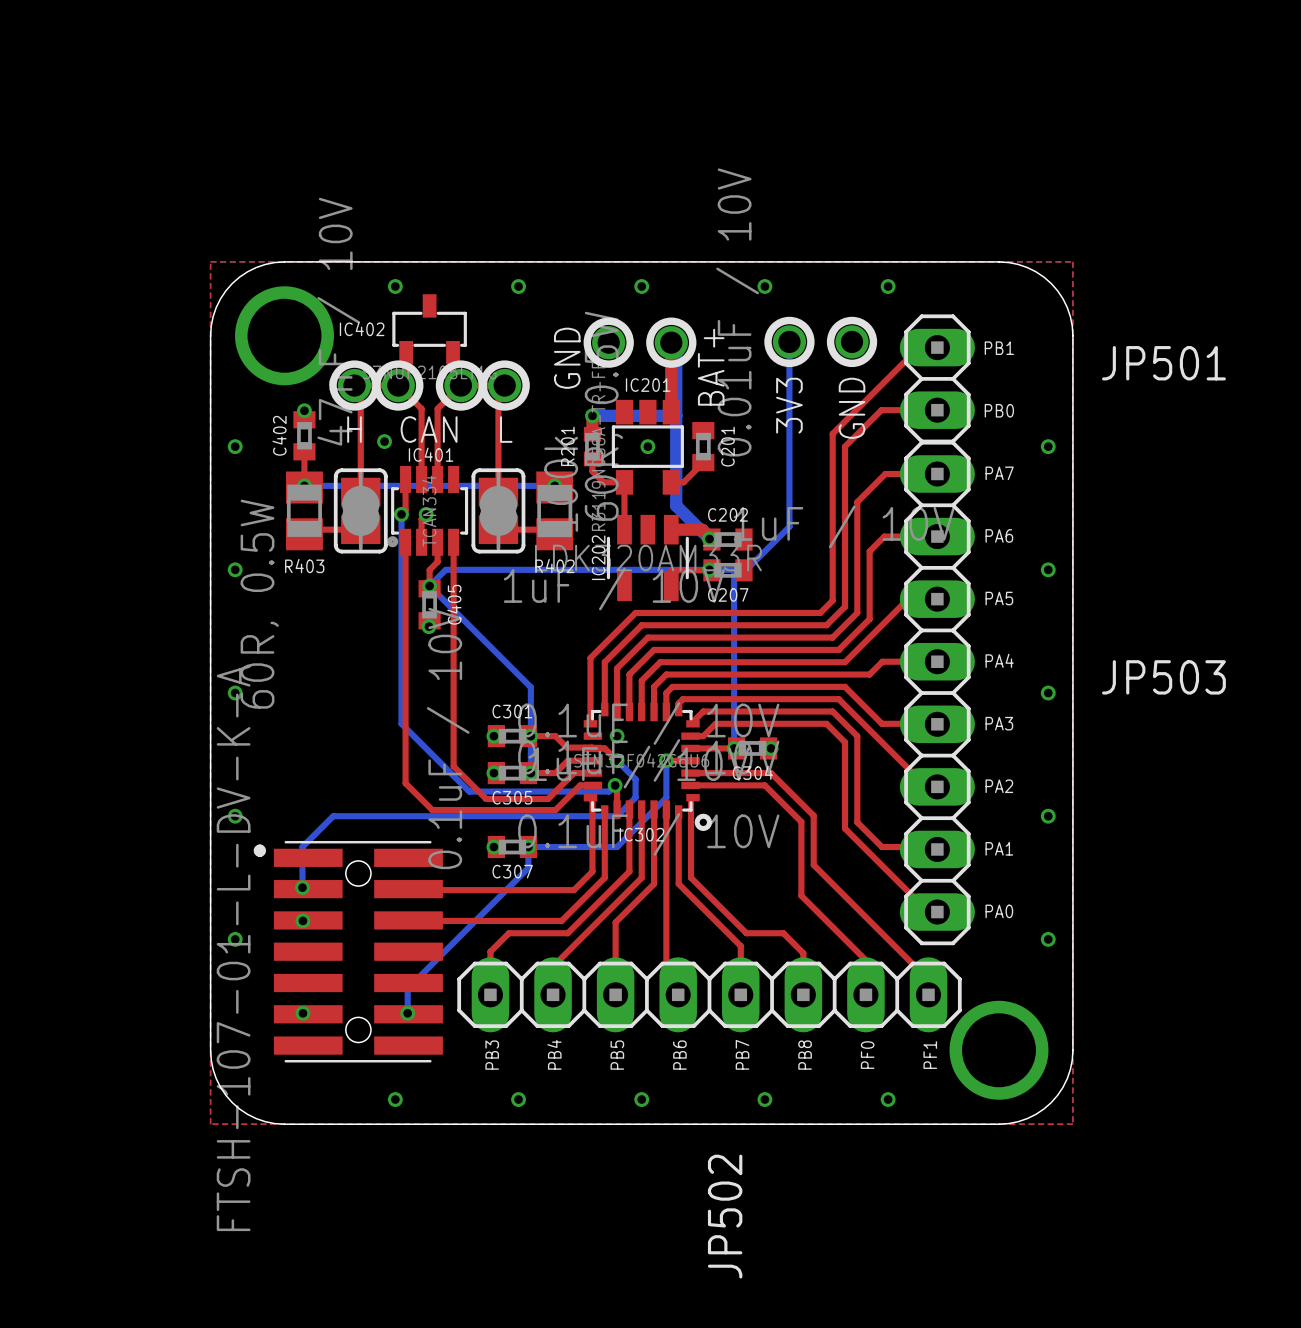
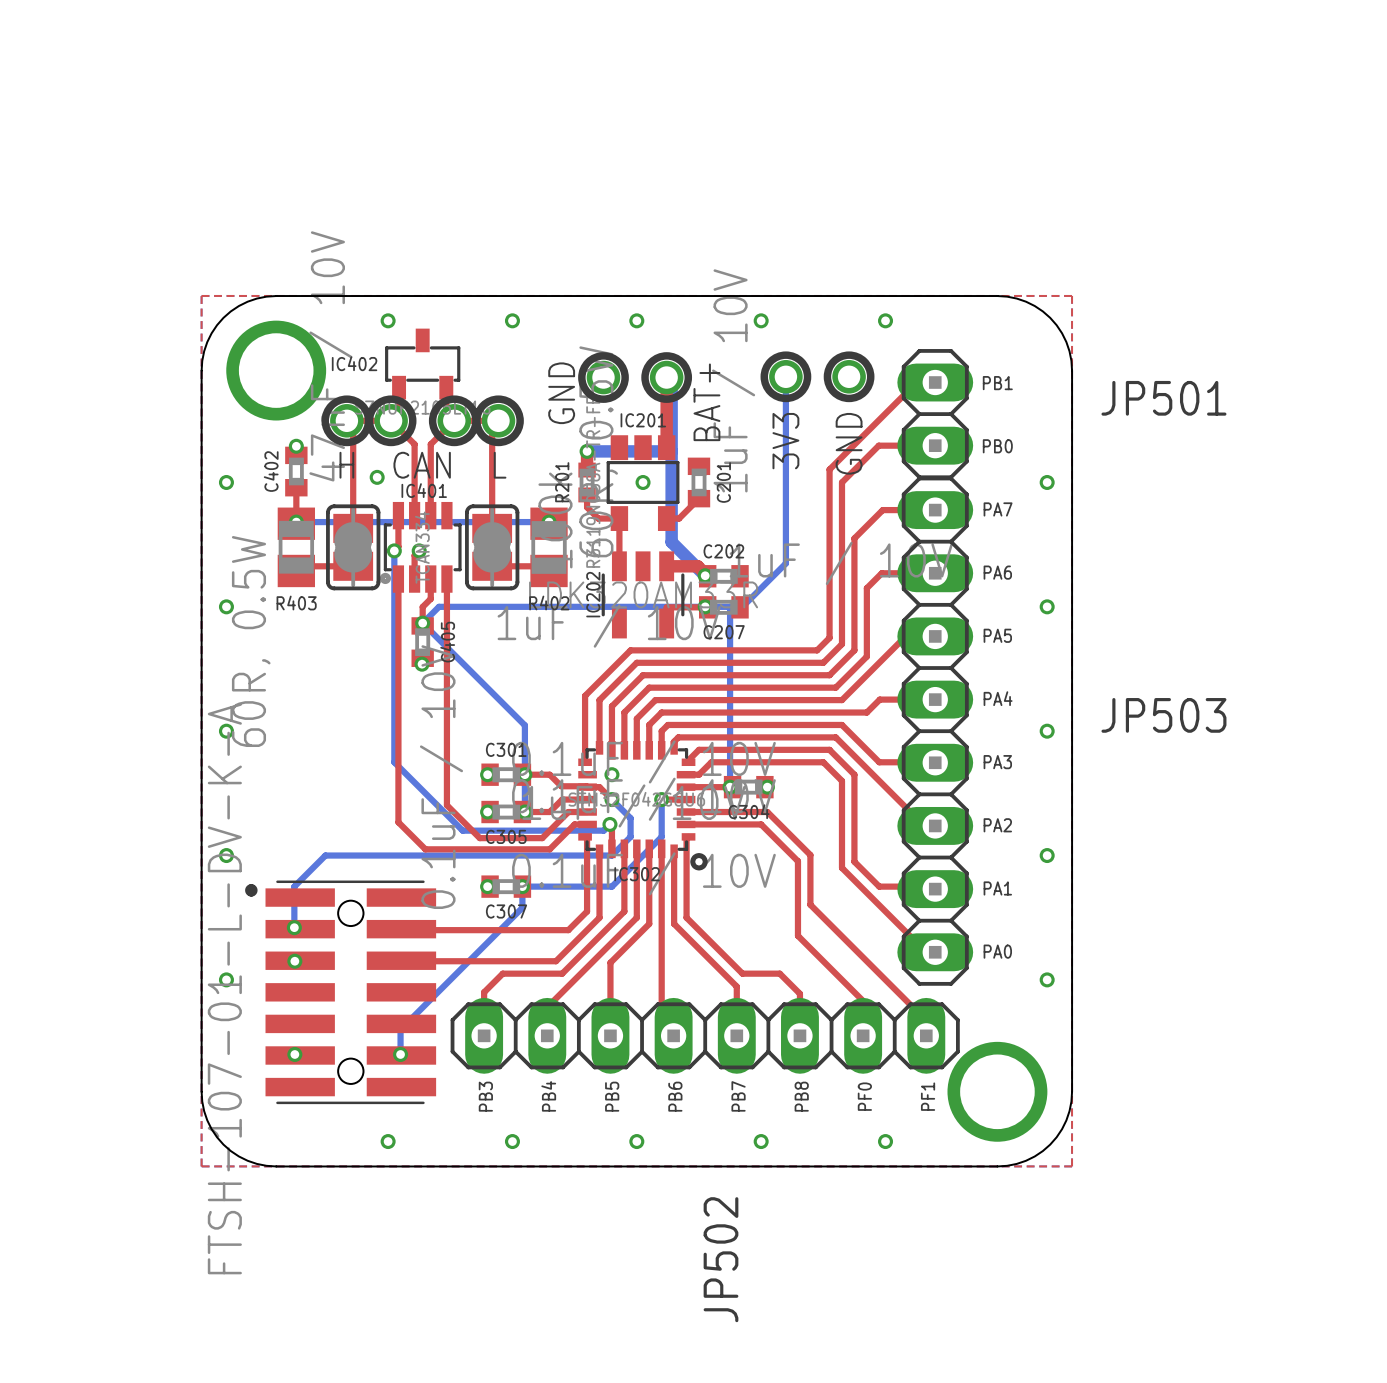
C201 value: 0.01uF / 10V (737, 312) -> 1uF / 10V (733, 380)

